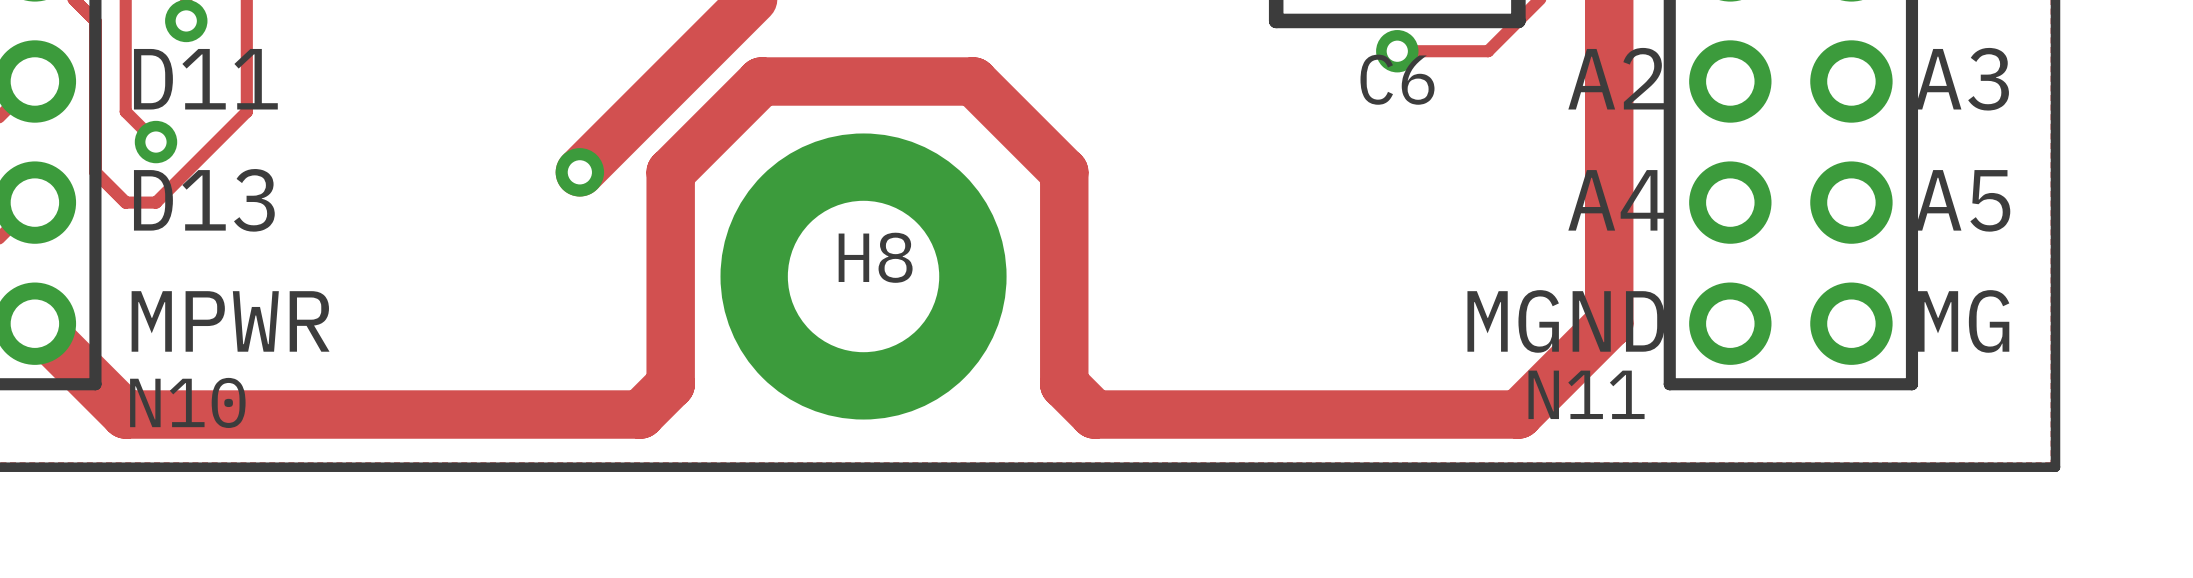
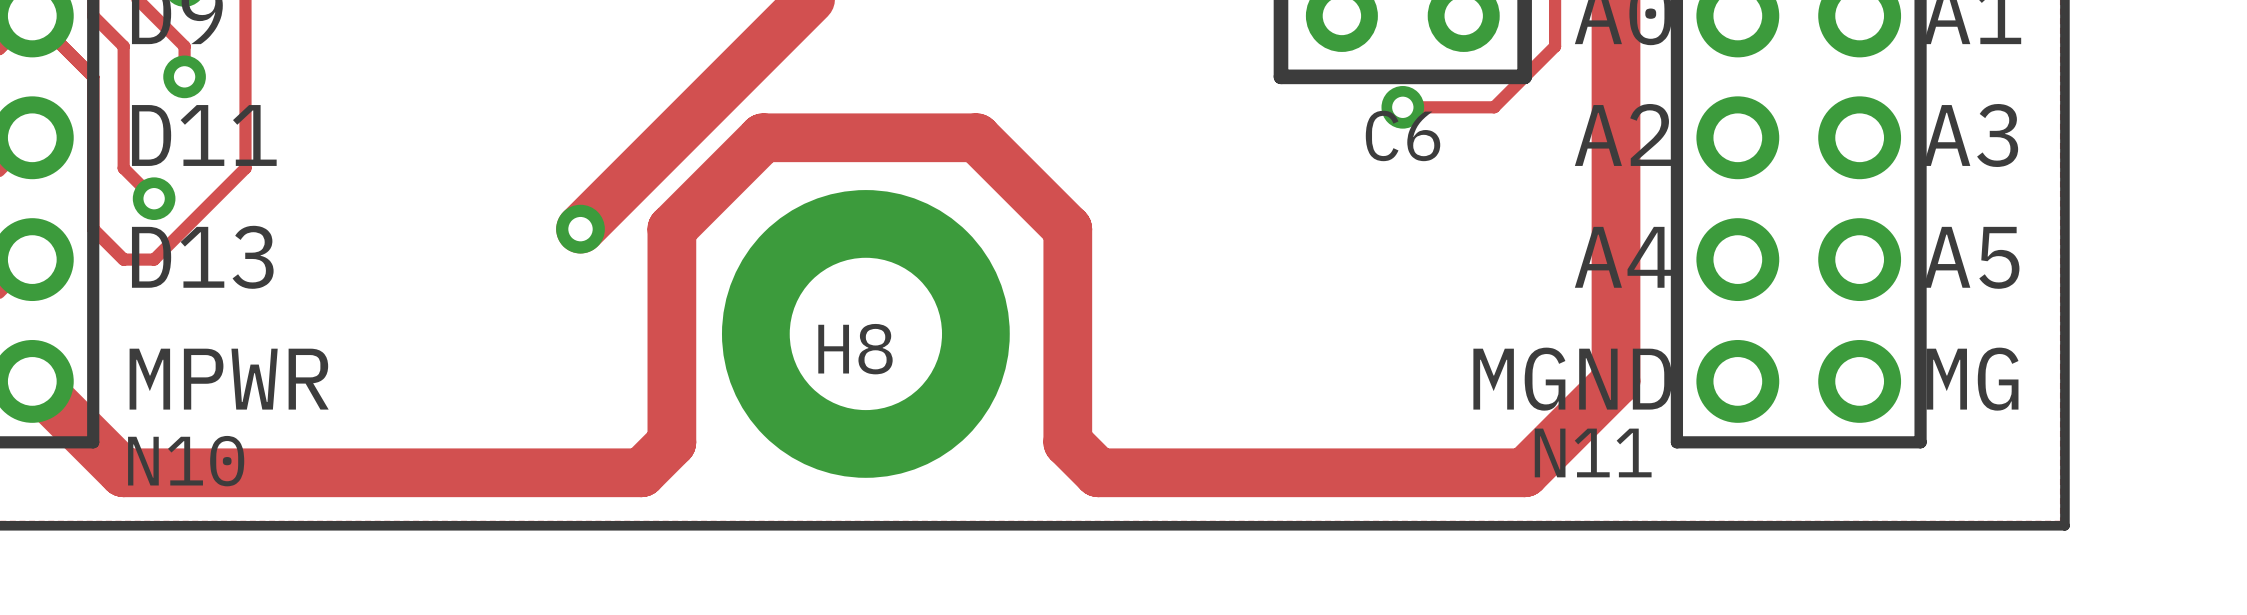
H8 name position: H8 (875, 257) -> H8 (855, 349)

